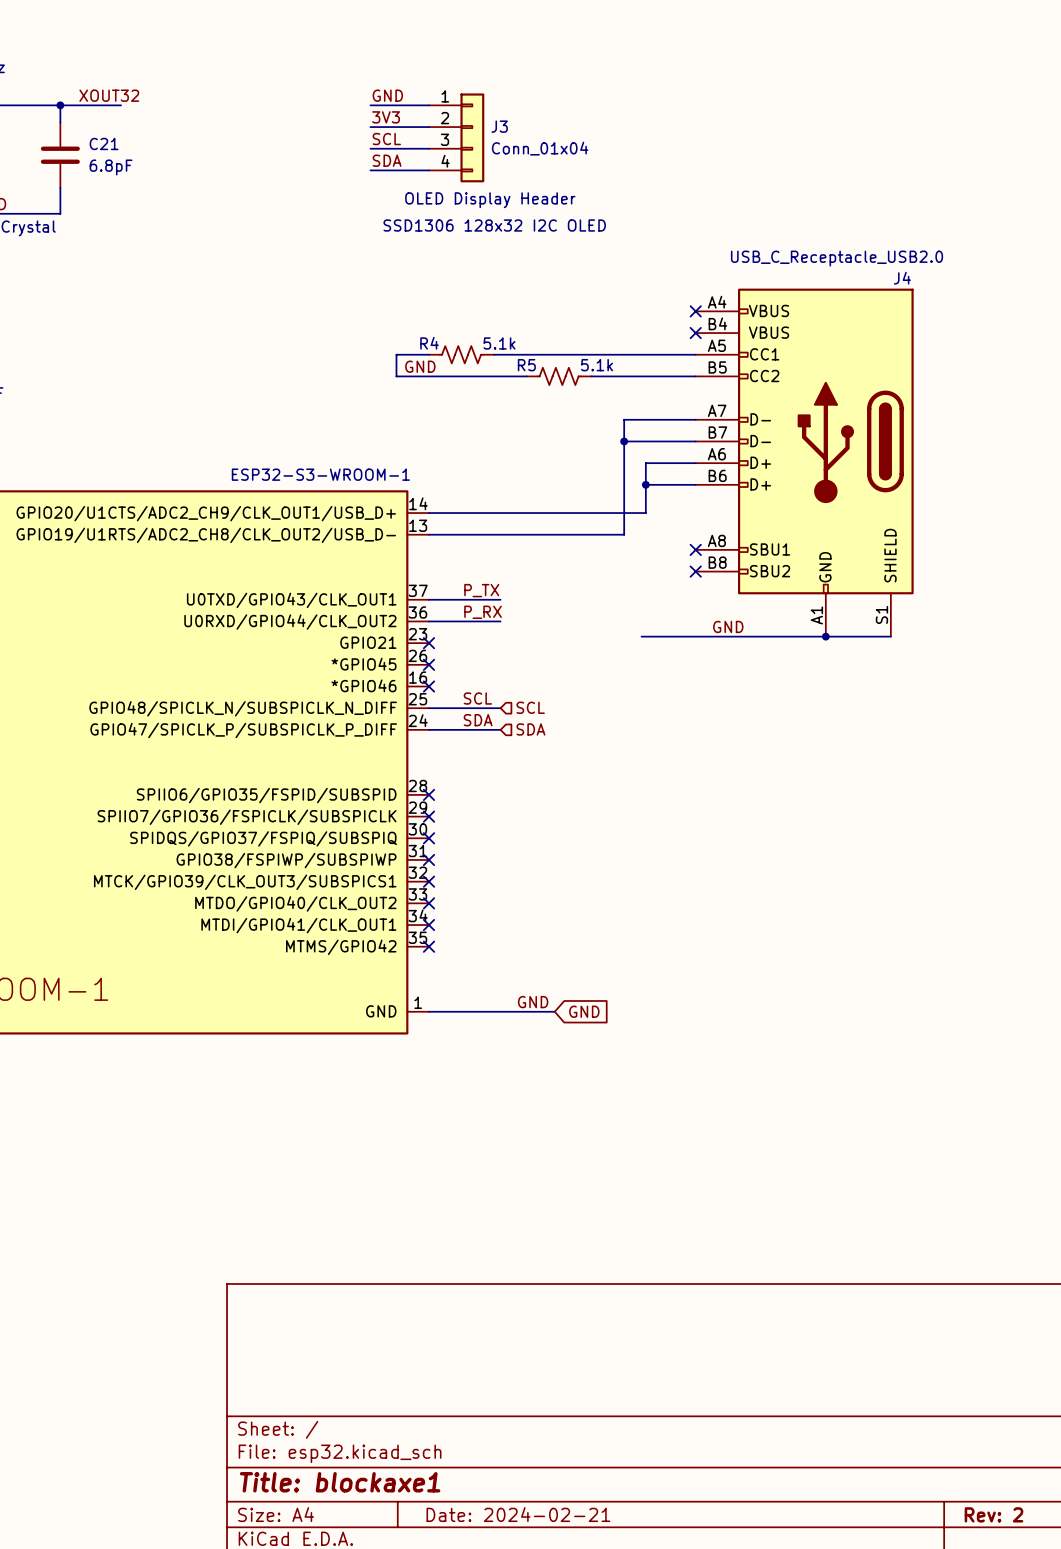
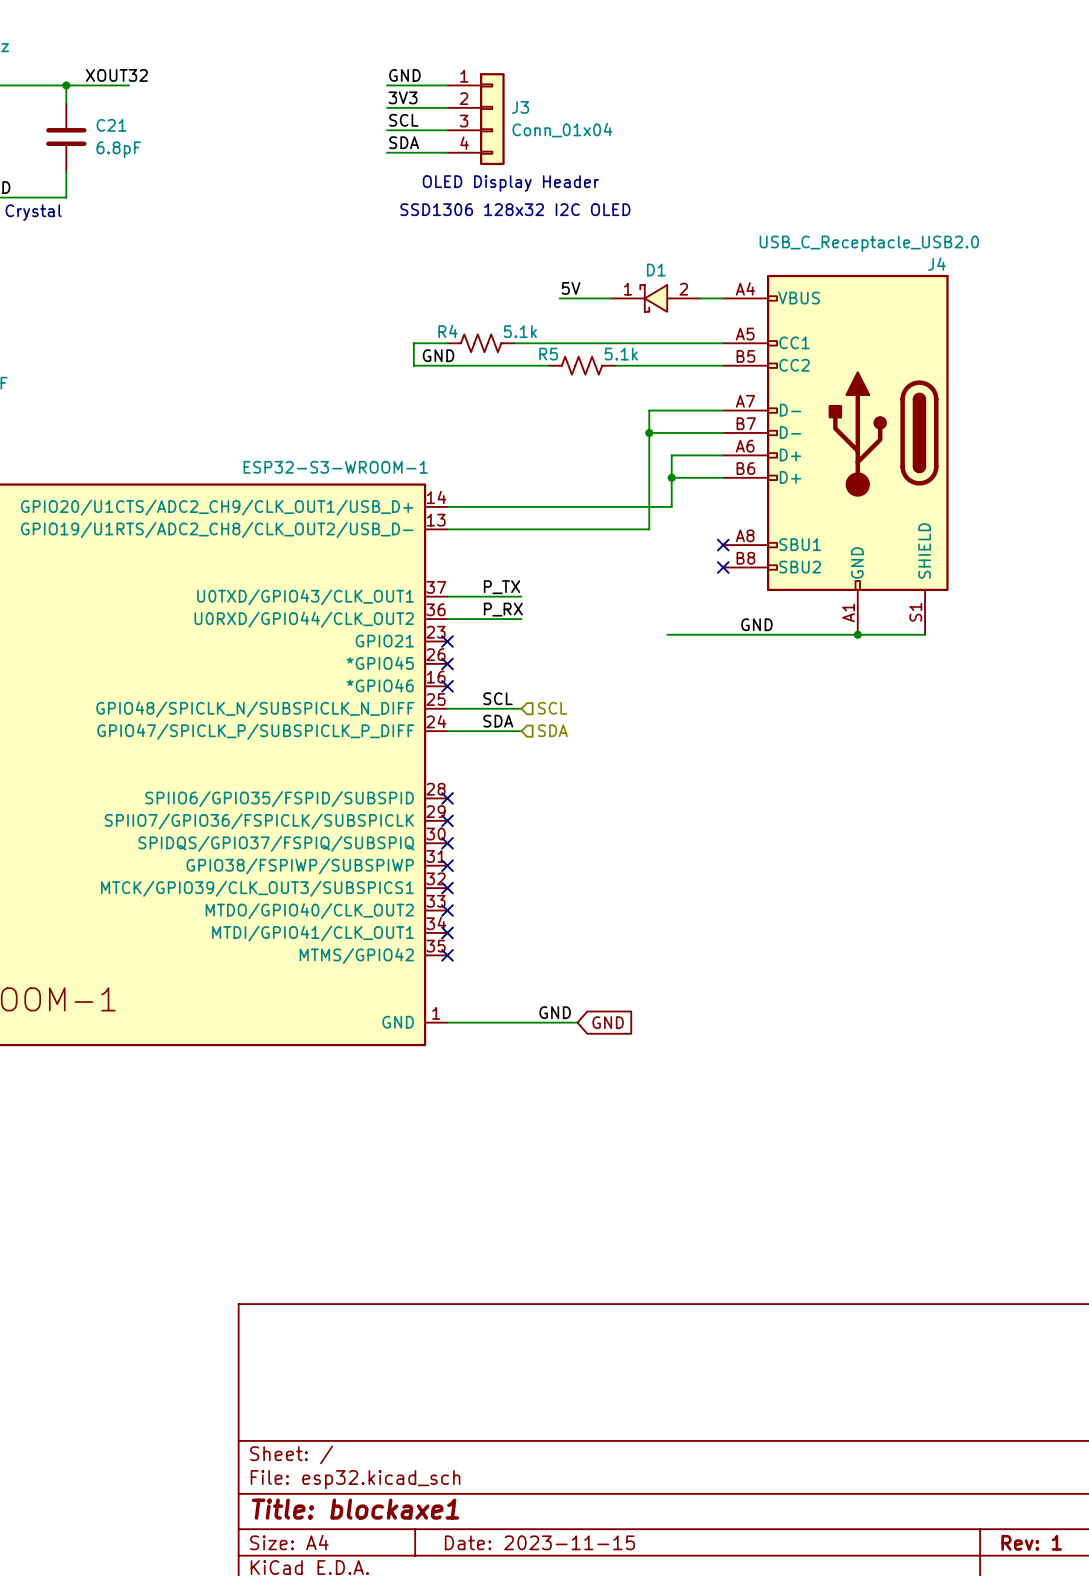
J4 symbol: [695, 288, 914, 637] -> [723, 274, 949, 635]
label: none -> 5V (571, 288)
wire: none -> (559, 298) (611, 298)
D1: none -> (656, 298)
wire: none -> (700, 298) (723, 298)
no-connect mark: (695, 311) -> none
no-connect mark: (695, 333) -> none
title block: Date: 2024-02-21 (518, 1514) -> Date: 2023-11-15 (539, 1542)
title block: Rev: 2 (993, 1514) -> Rev: 1 (1031, 1542)

